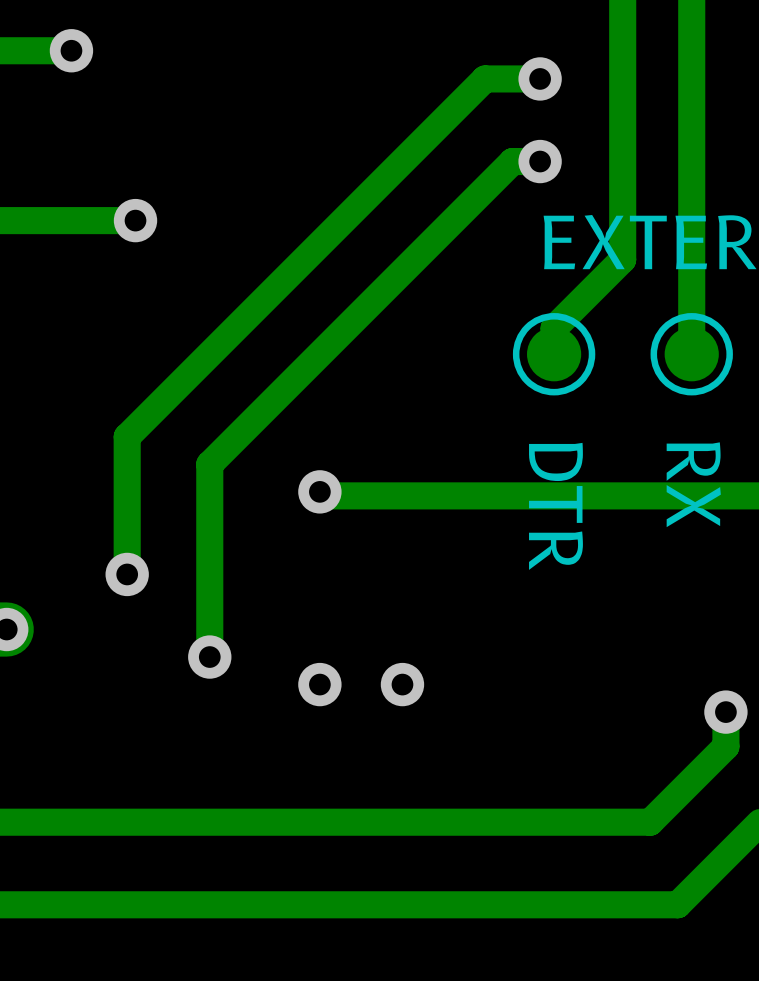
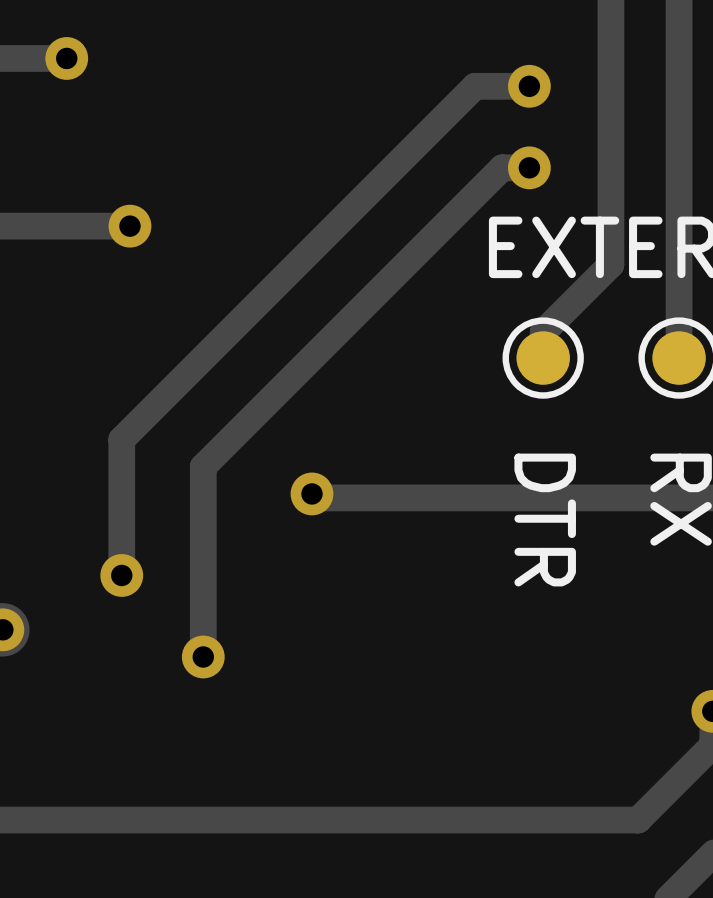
via: (319, 684) -> none
via: (402, 684) -> none

